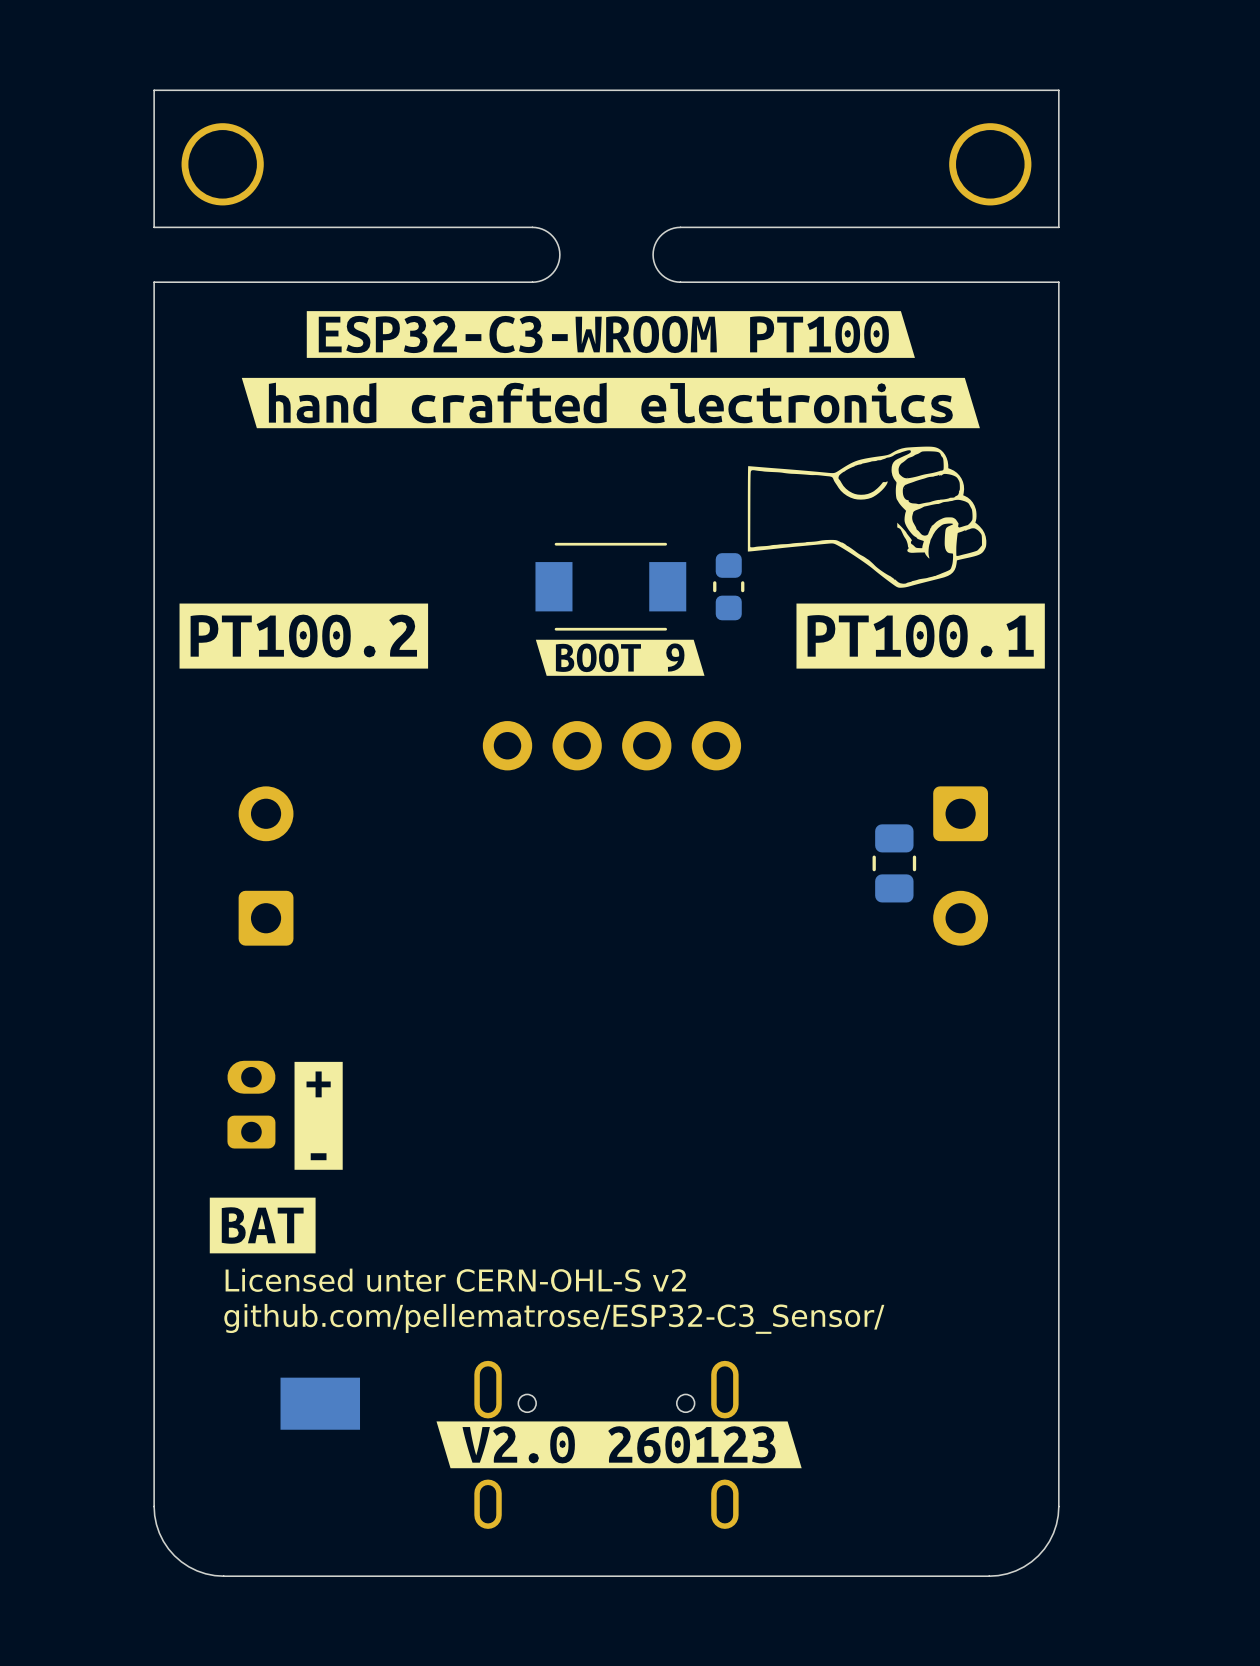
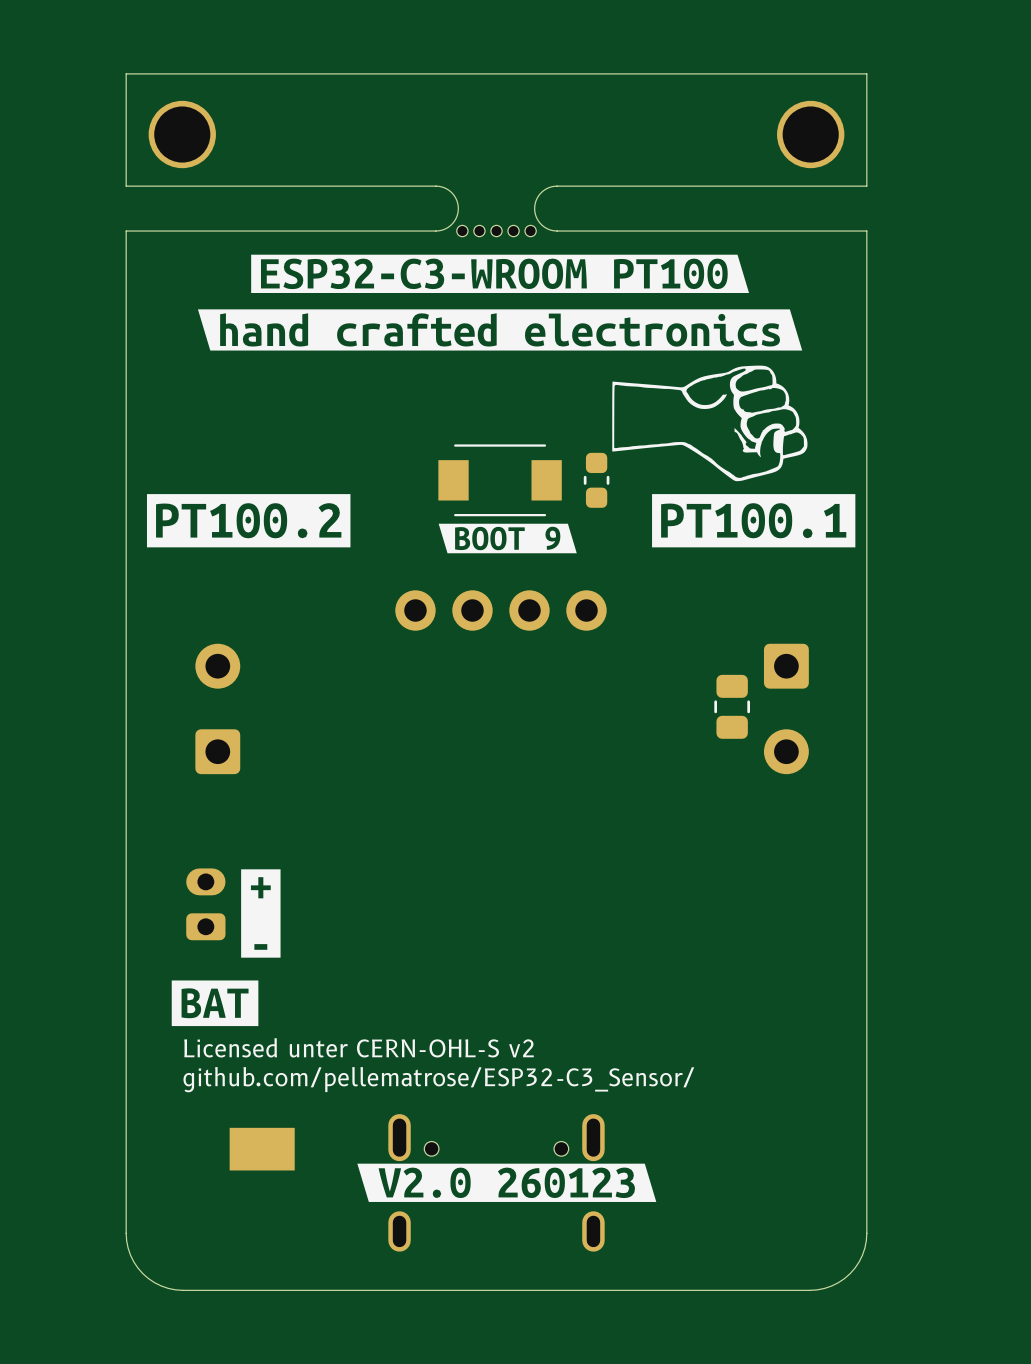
part: none -> (496, 231)

